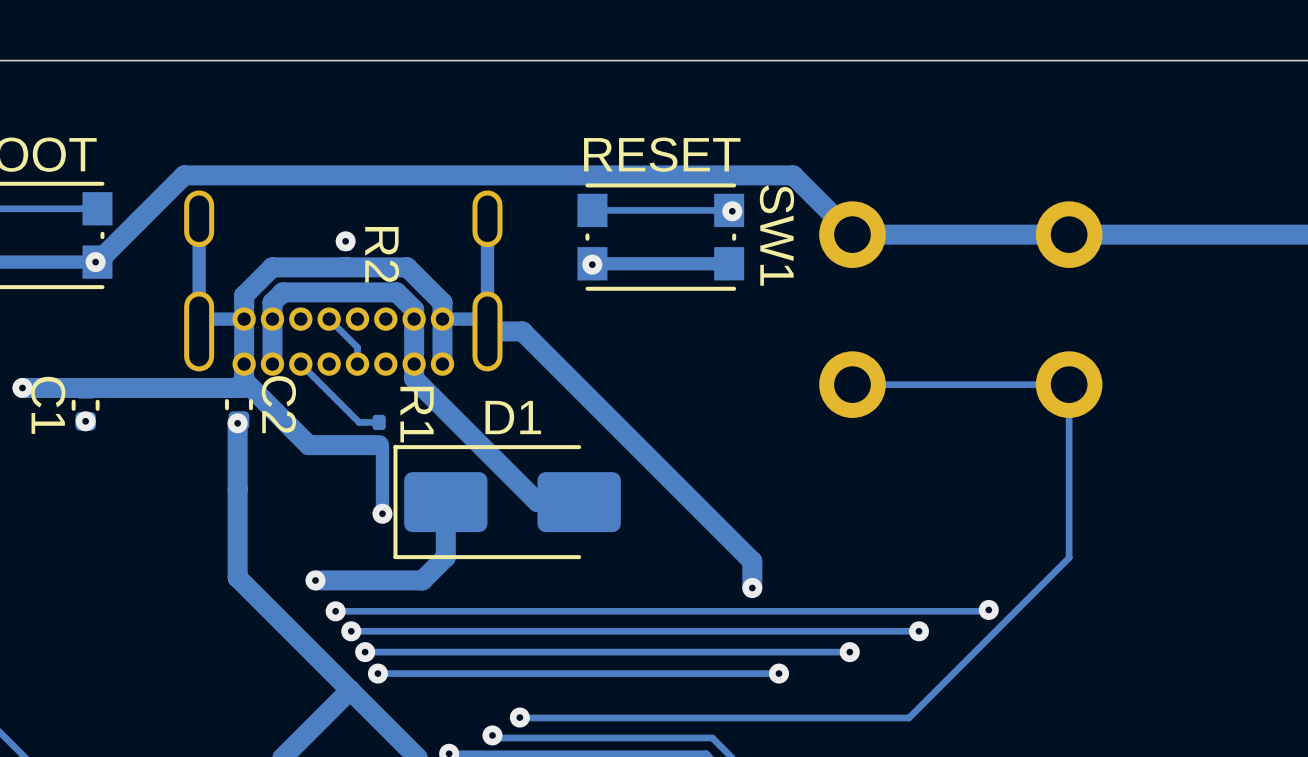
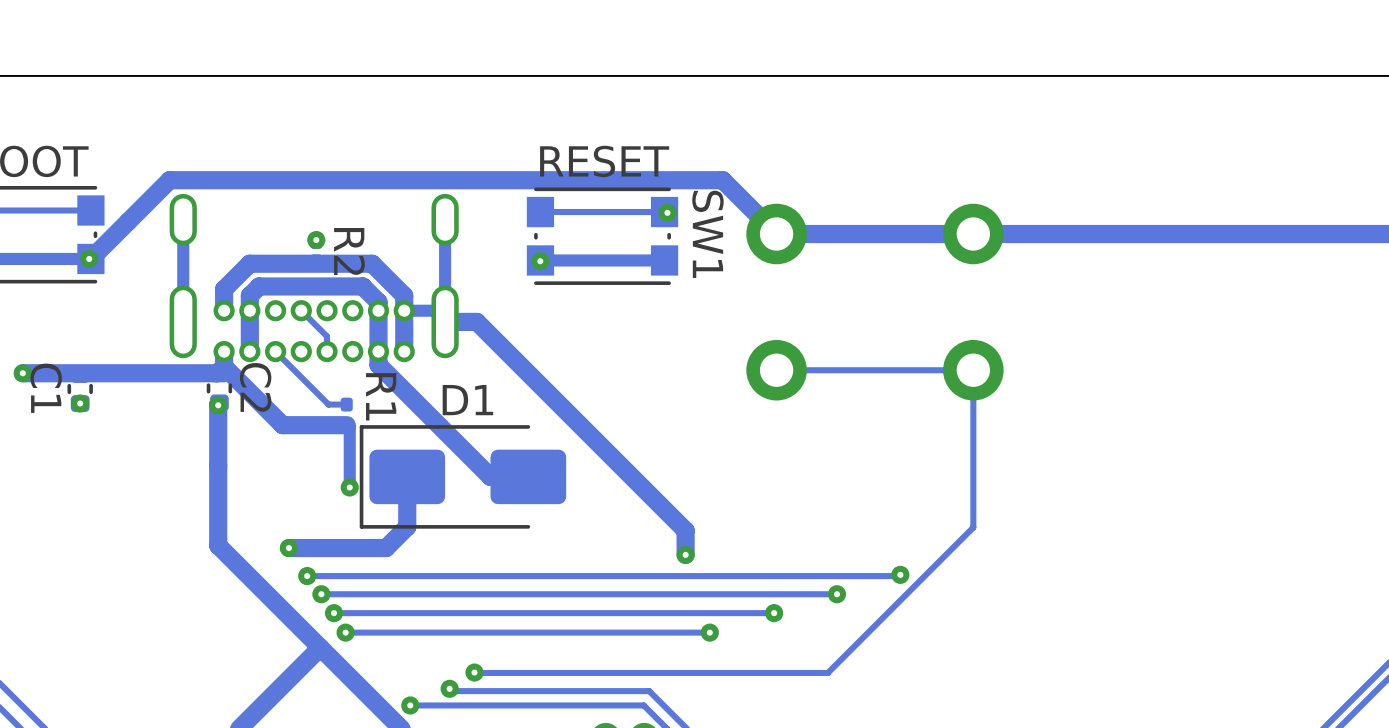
track: (199, 331) (211, 319) (244, 319) (244, 364) -> none

